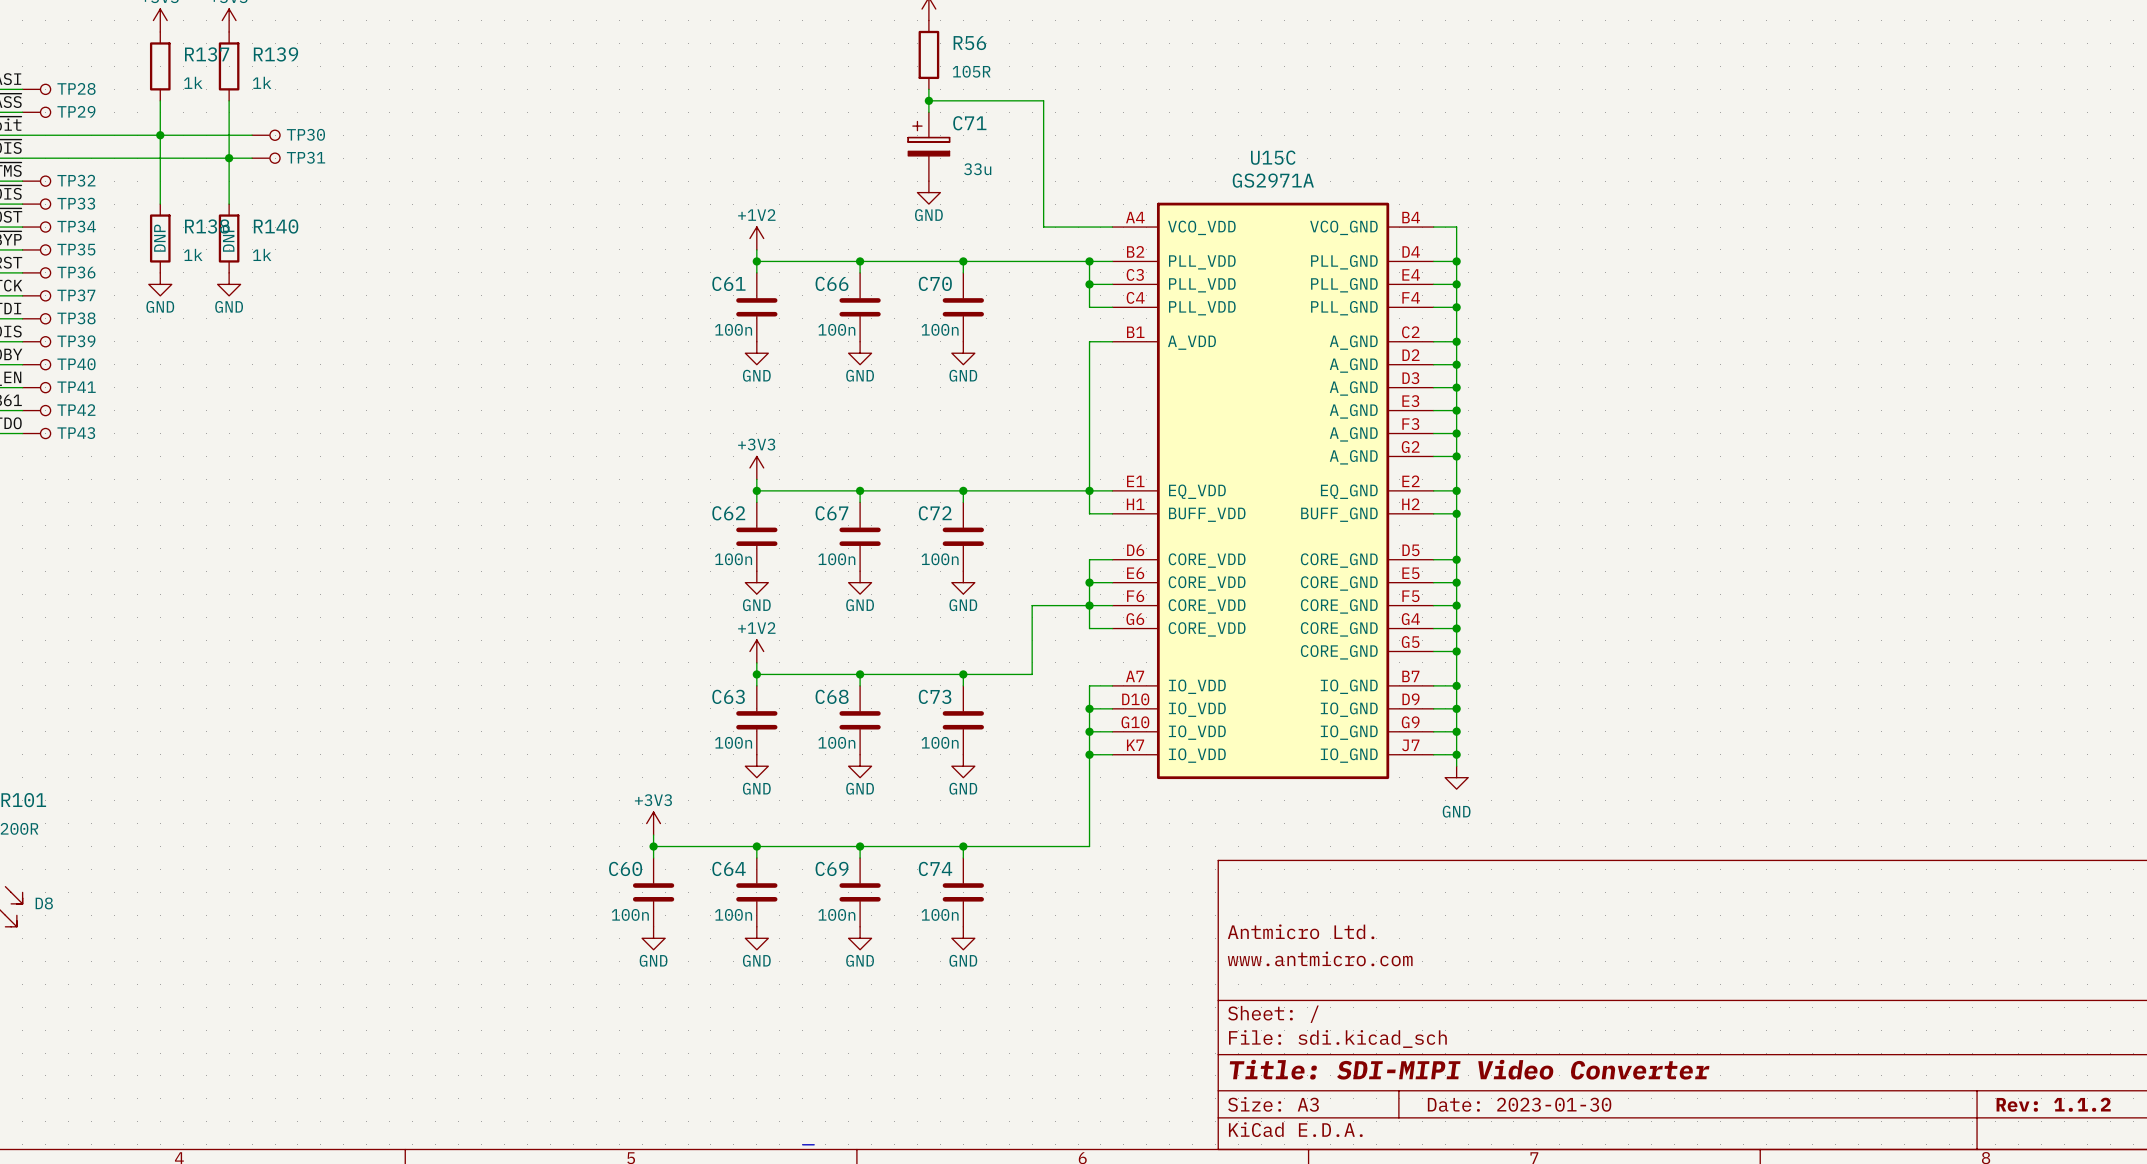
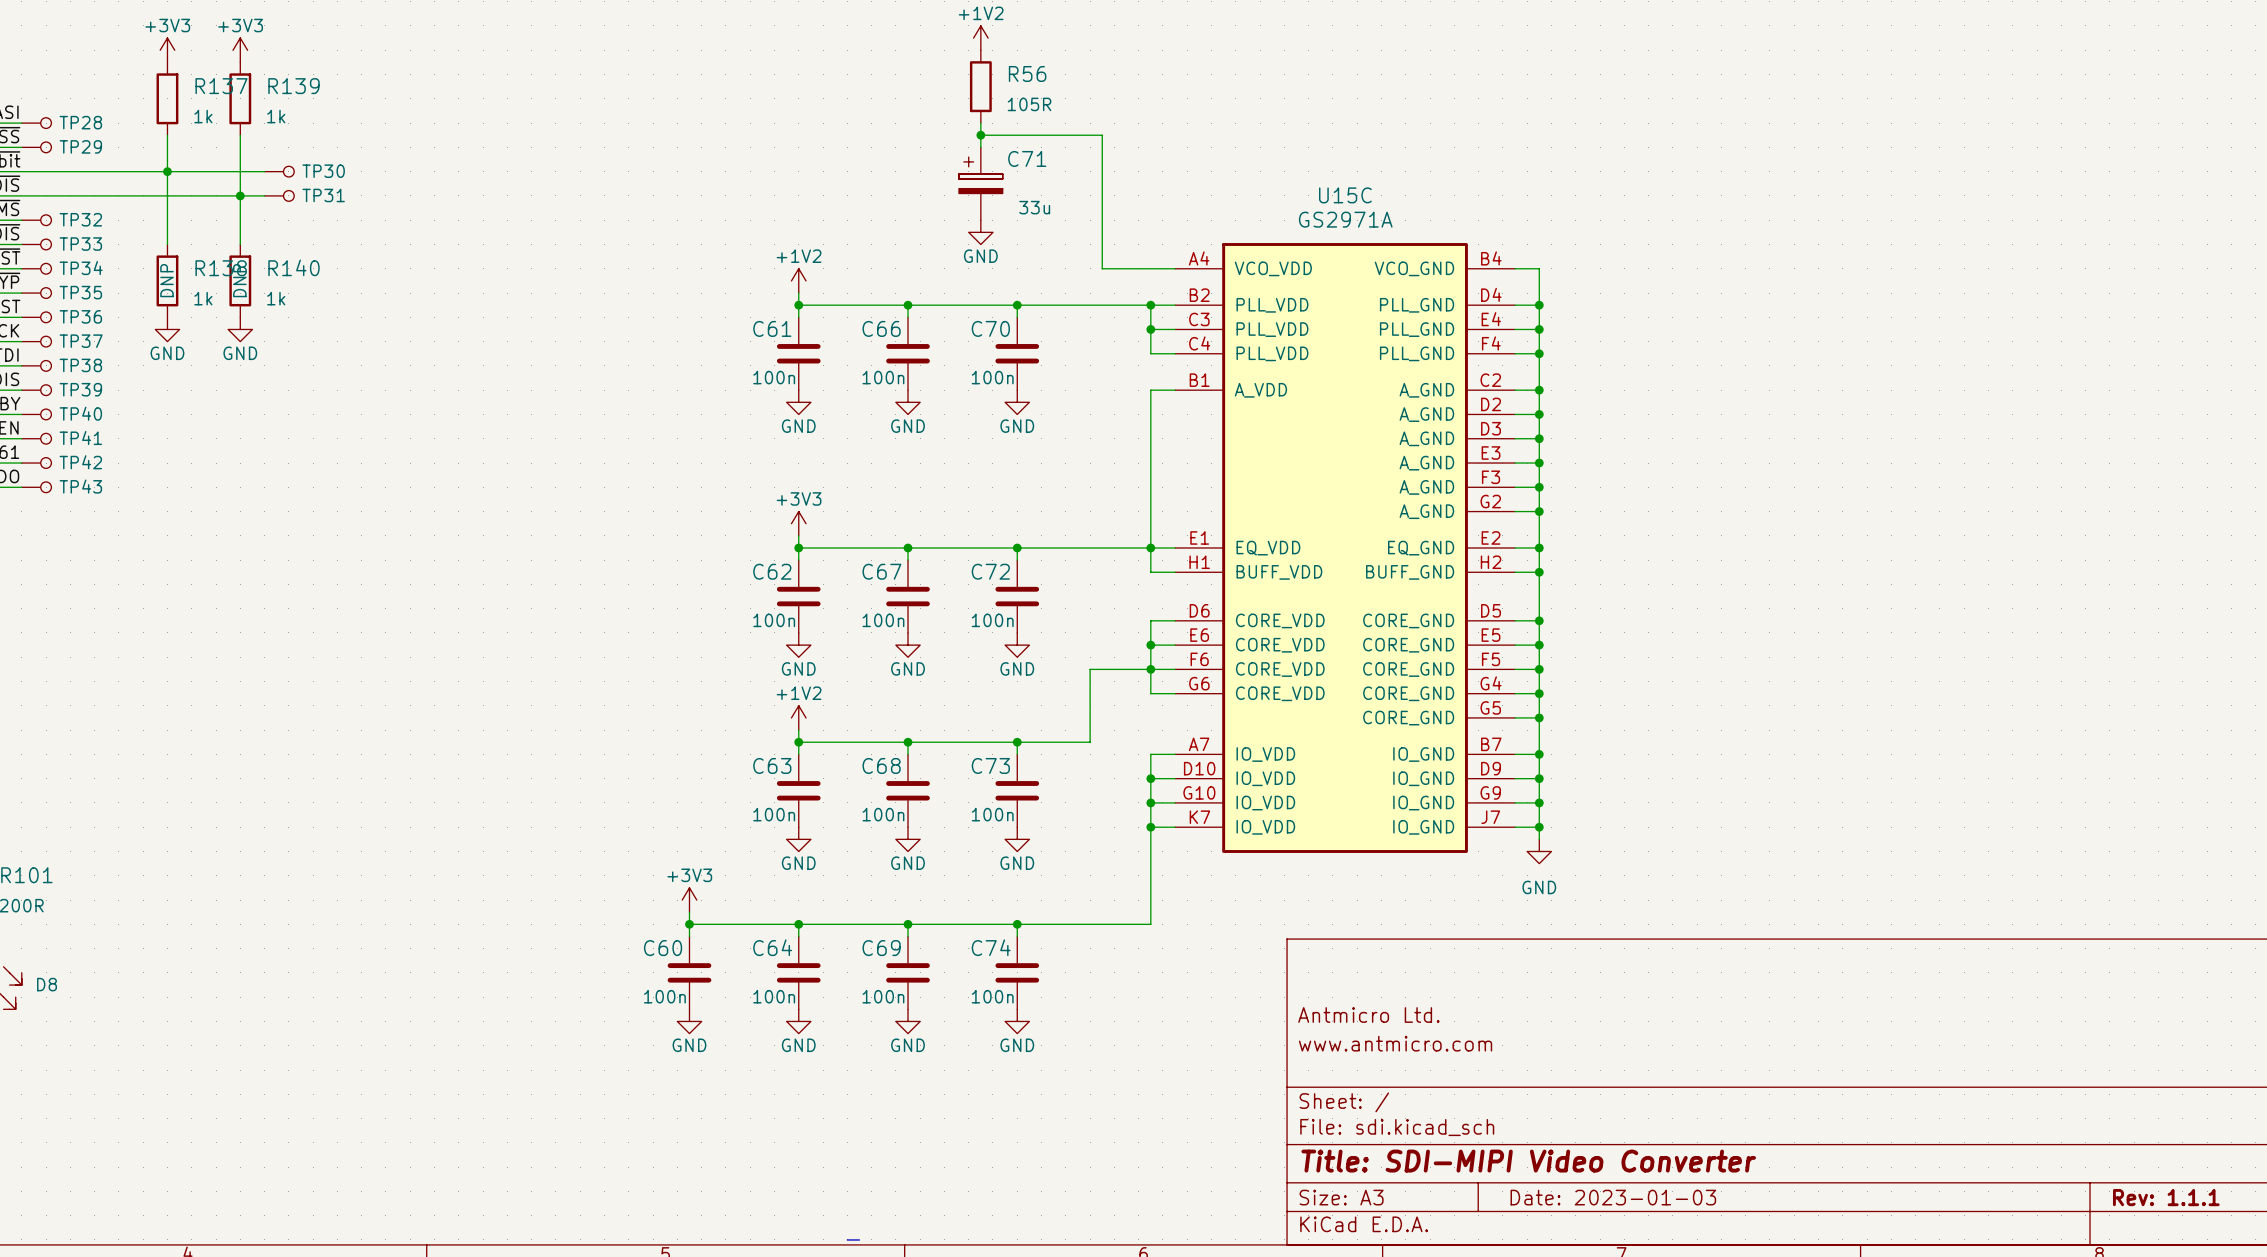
title block: Date: 2023-01-30 (1519, 1104) -> Date: 2023-01-03 (1613, 1197)
title block: Rev: 1.1.2 (2053, 1104) -> Rev: 1.1.1 (2166, 1197)

